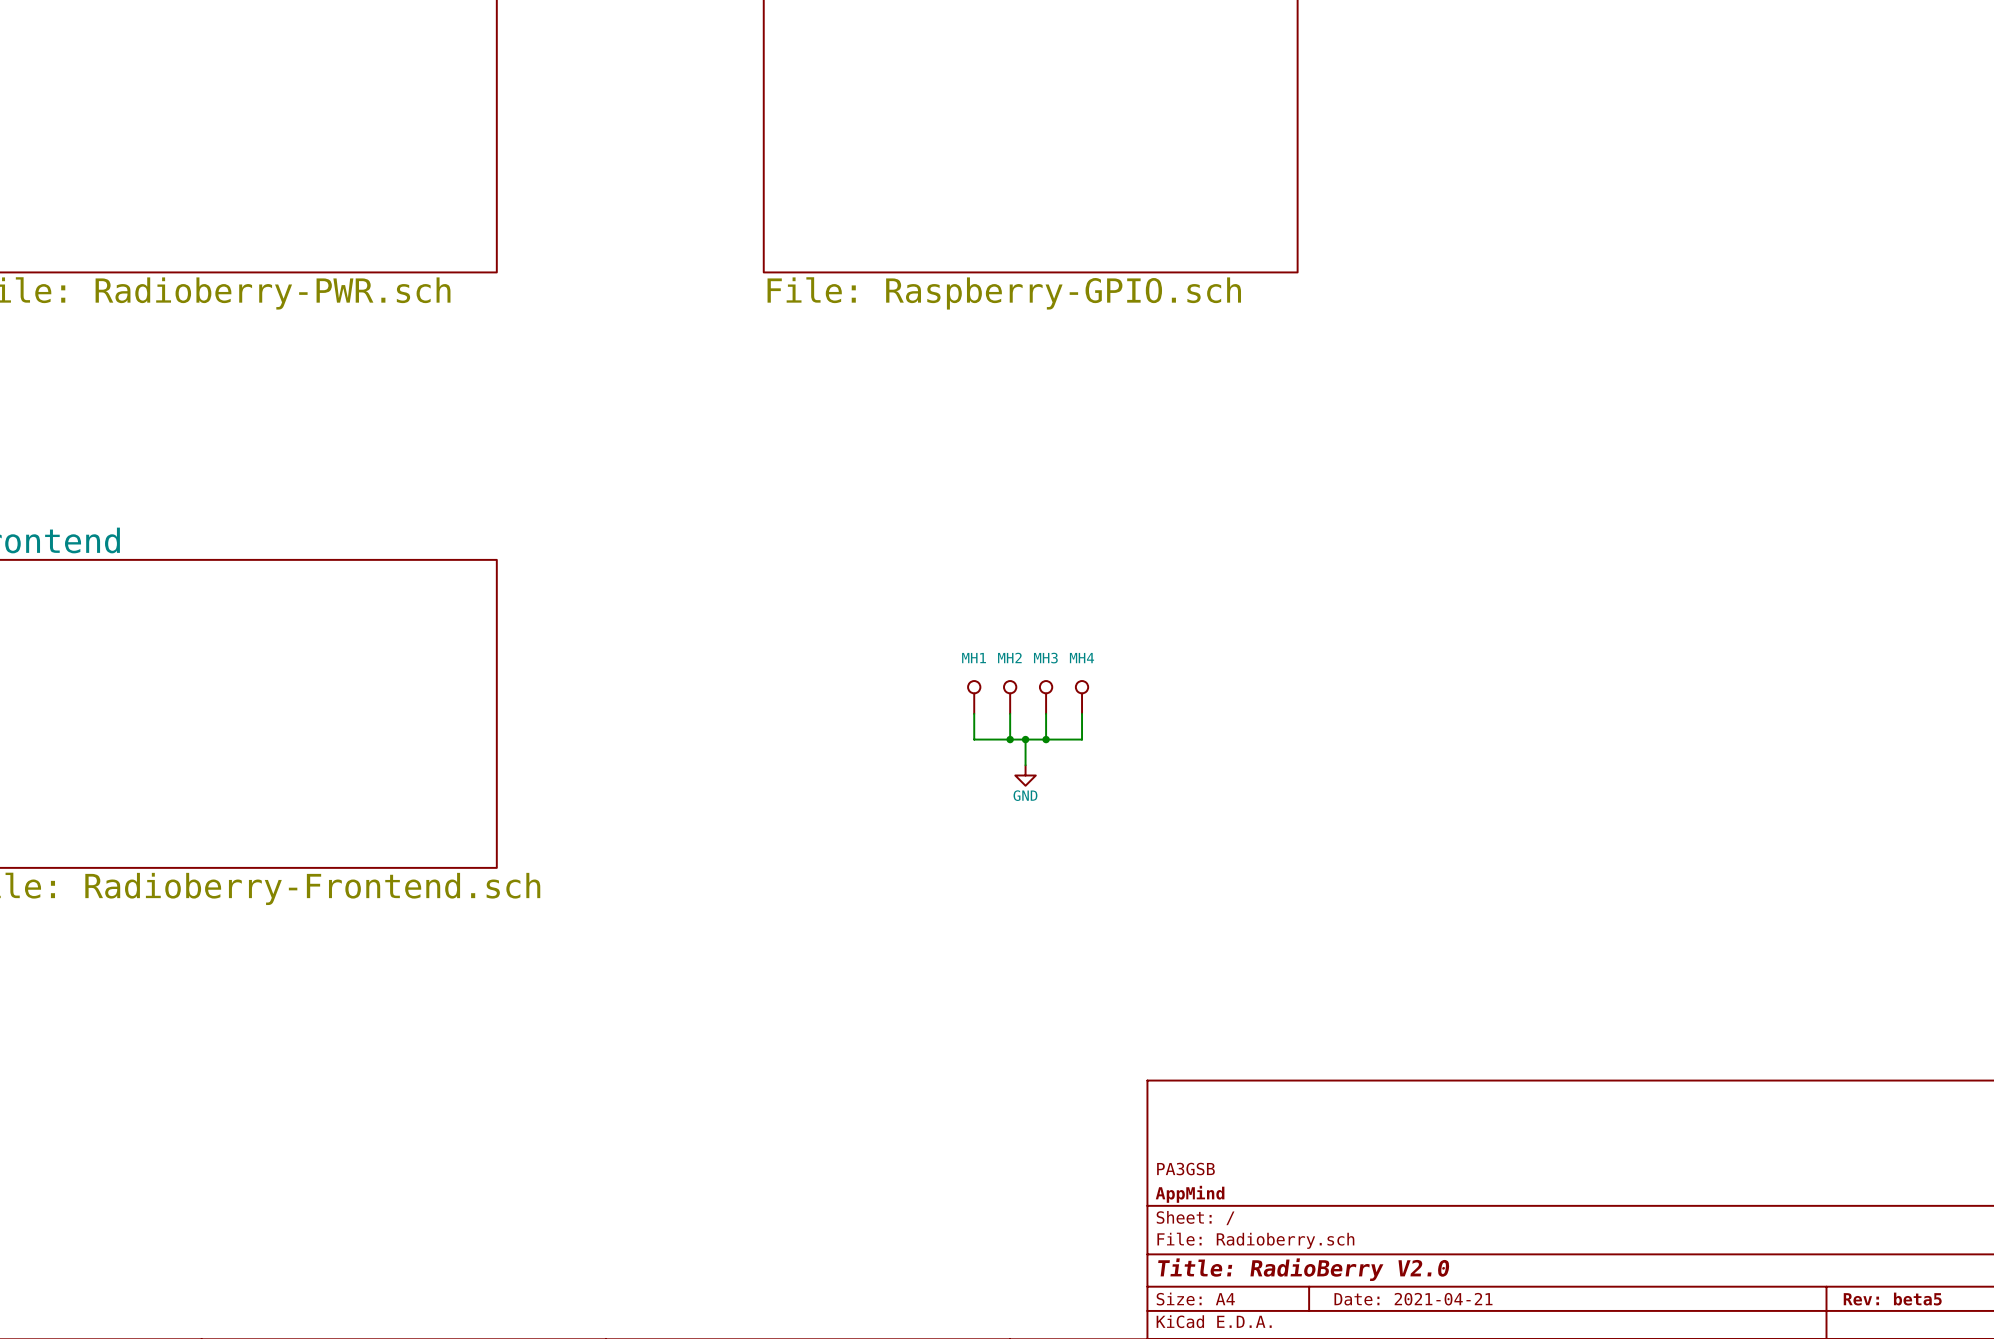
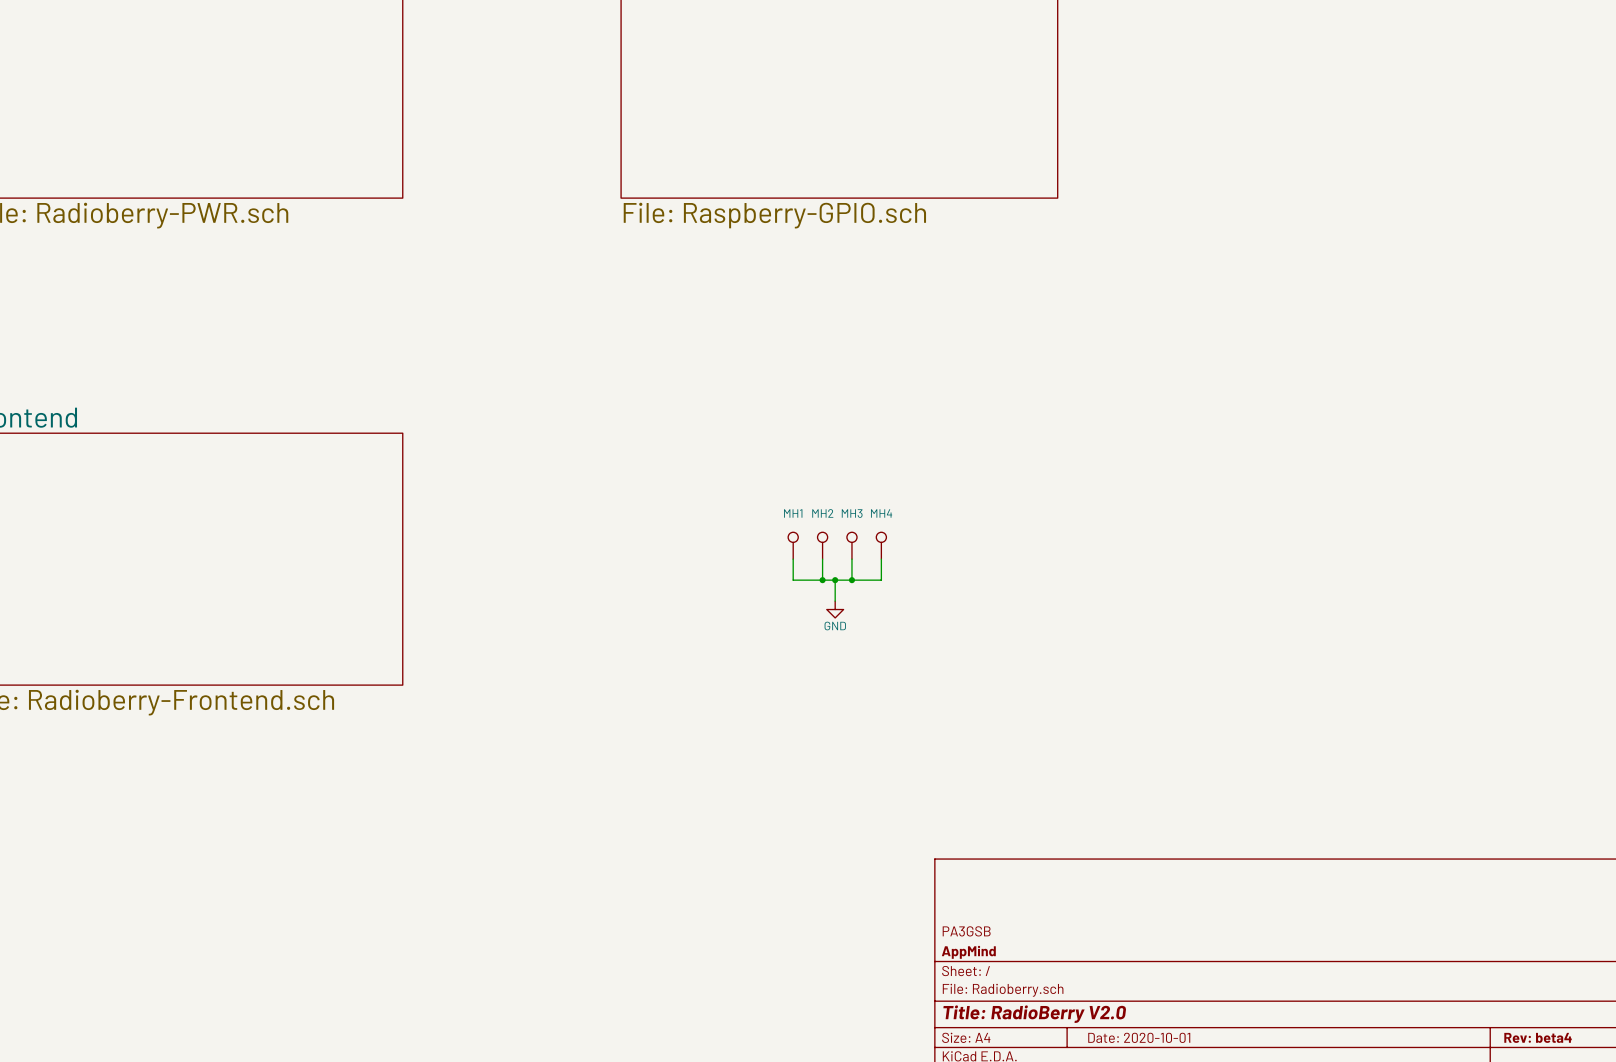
title block: Date: 2021-04-21 (1413, 1299) -> Date: 2020-10-01 (1139, 1037)
title block: Rev: beta5 (1892, 1299) -> Rev: beta4 (1538, 1037)

